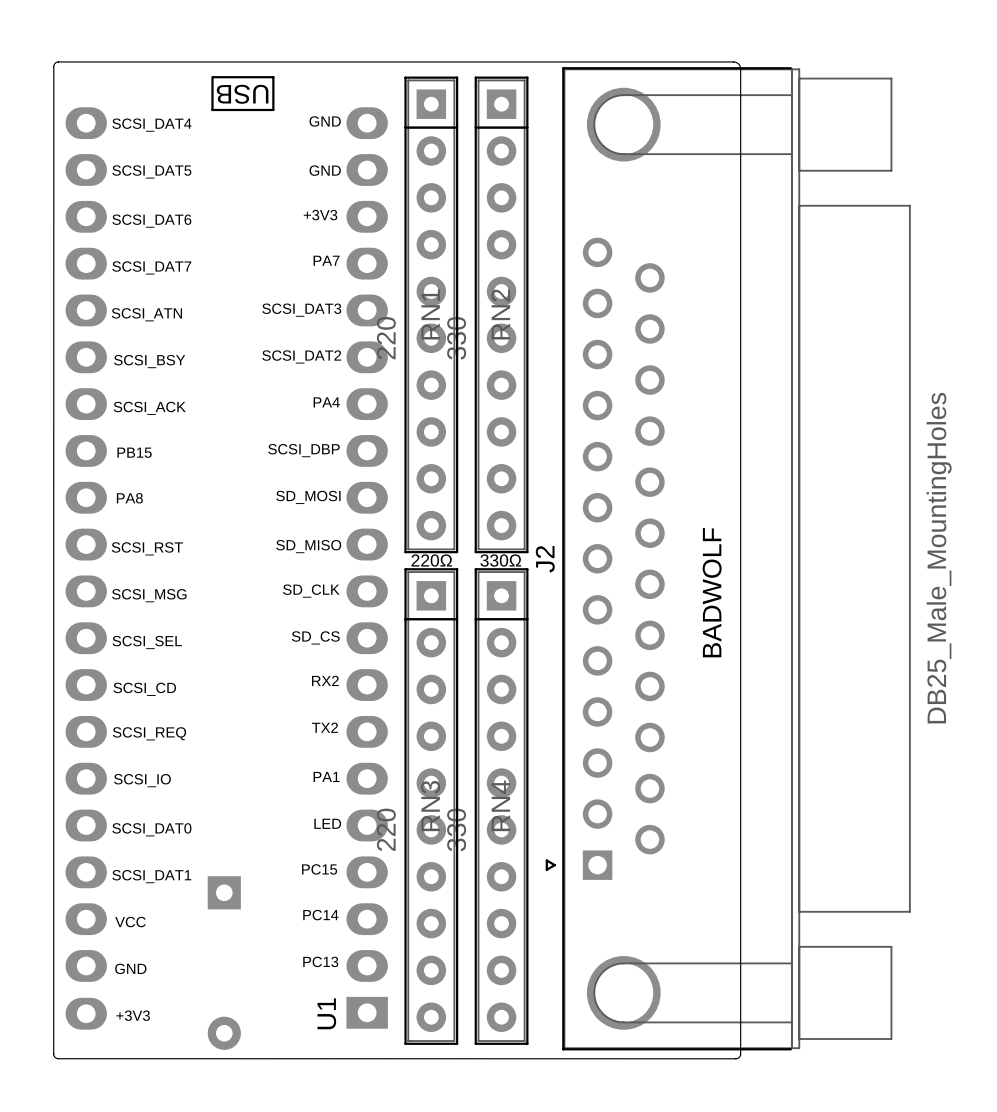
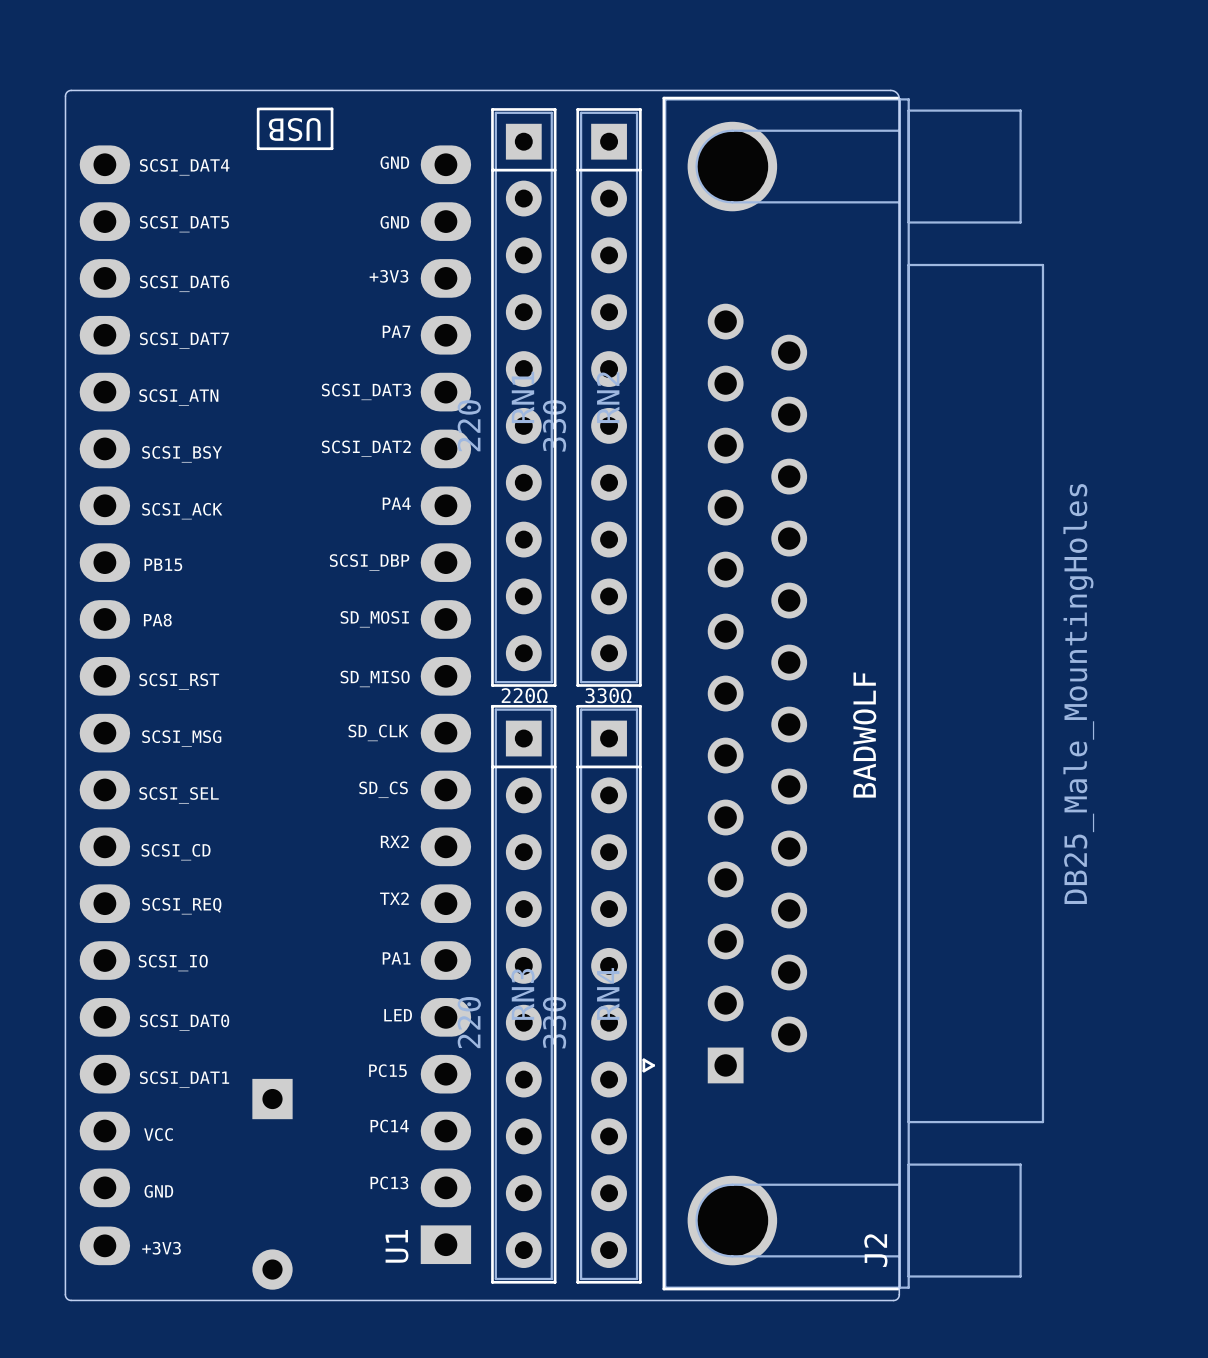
J2 footprint: [545, 67, 911, 1051] -> [642, 96, 1045, 1291]
J2 name position: J2 (545, 559) -> J2 (875, 1250)

